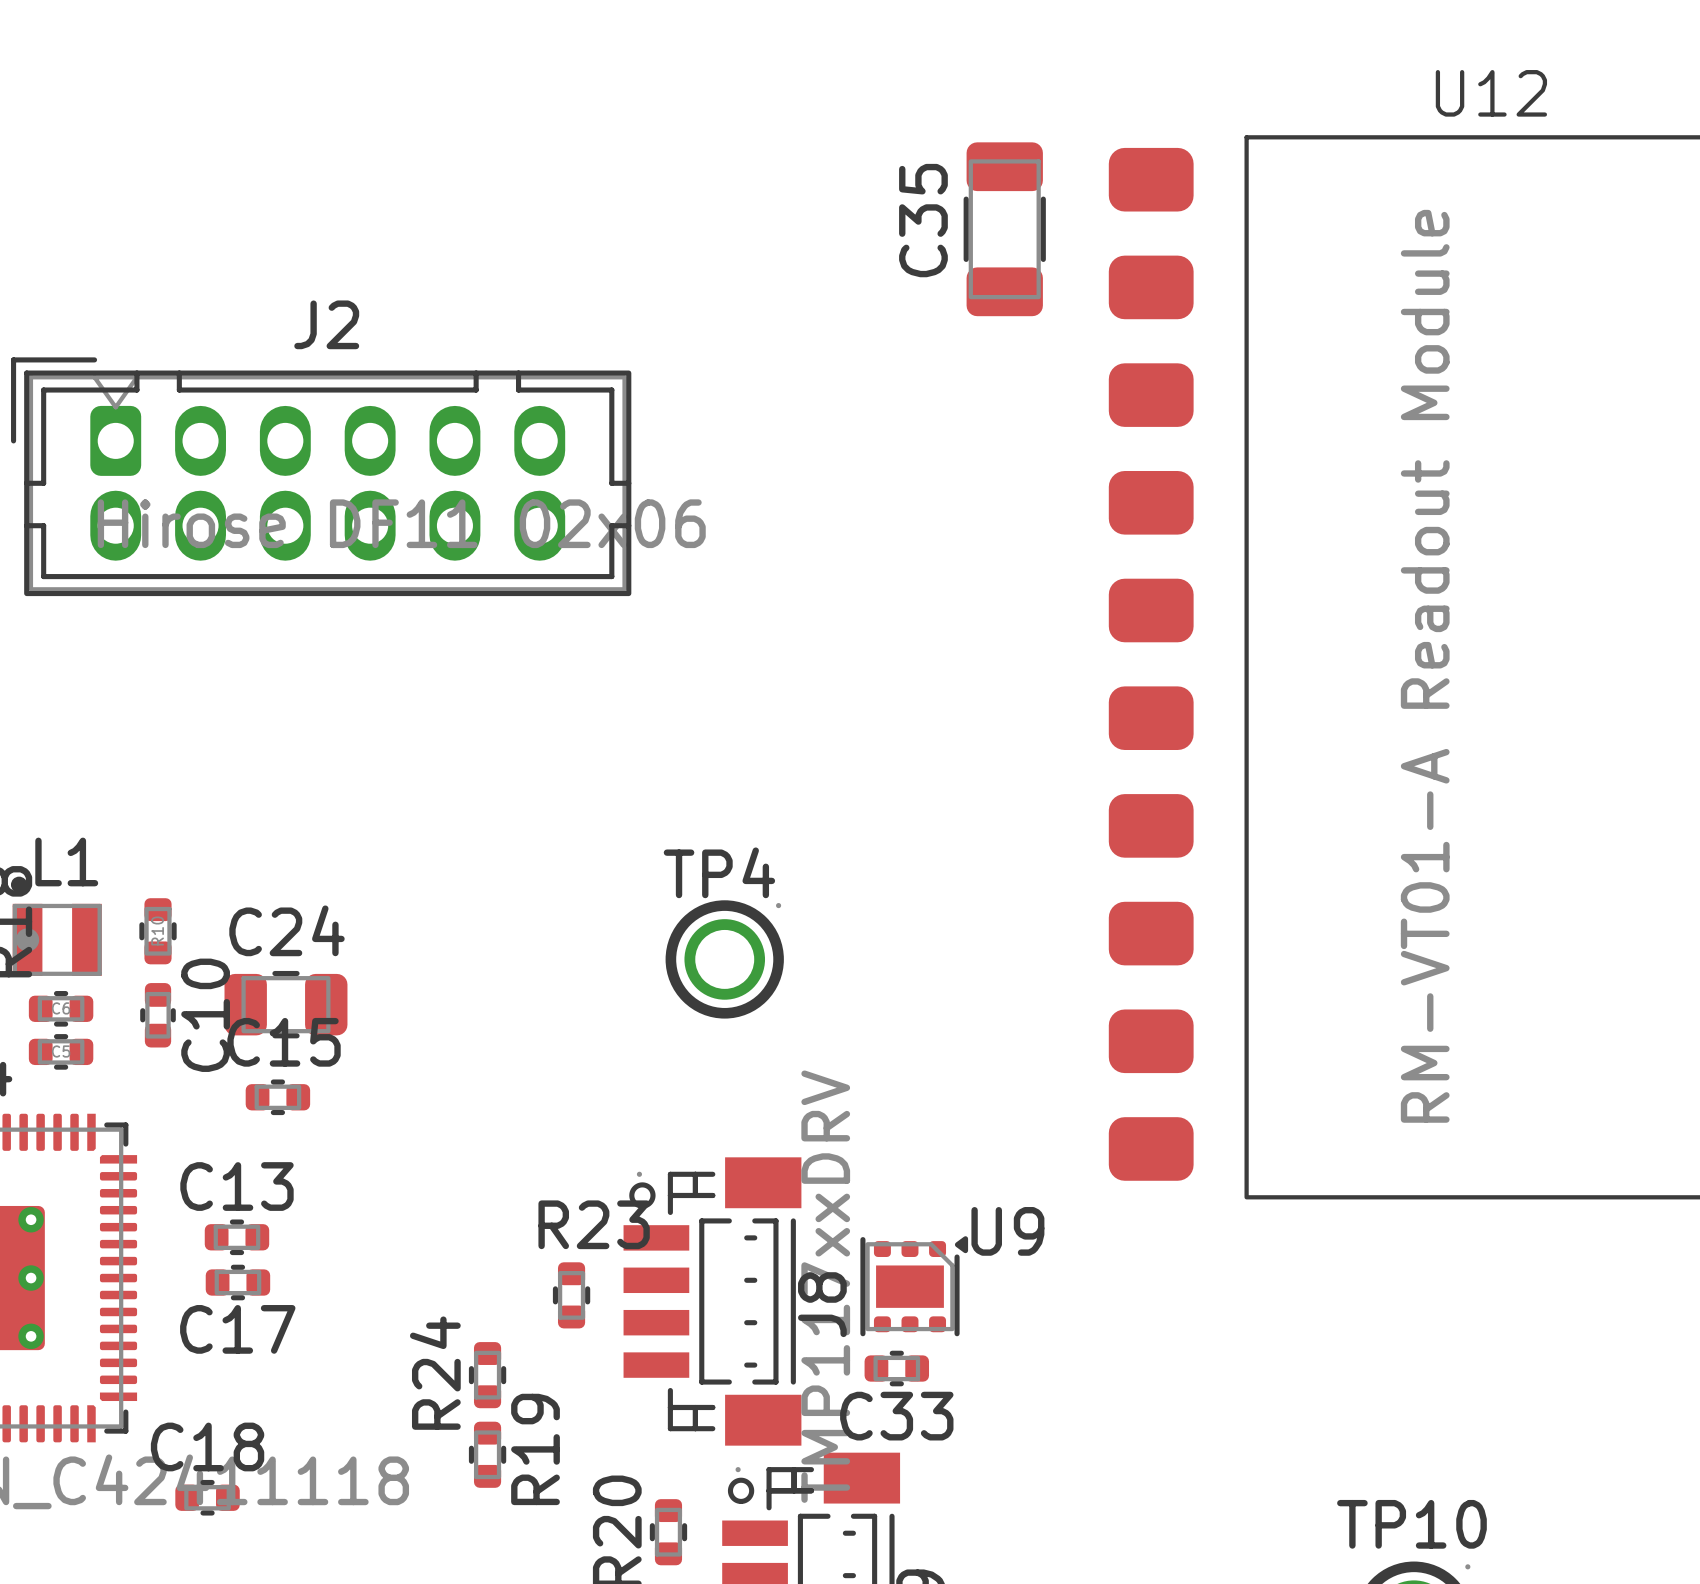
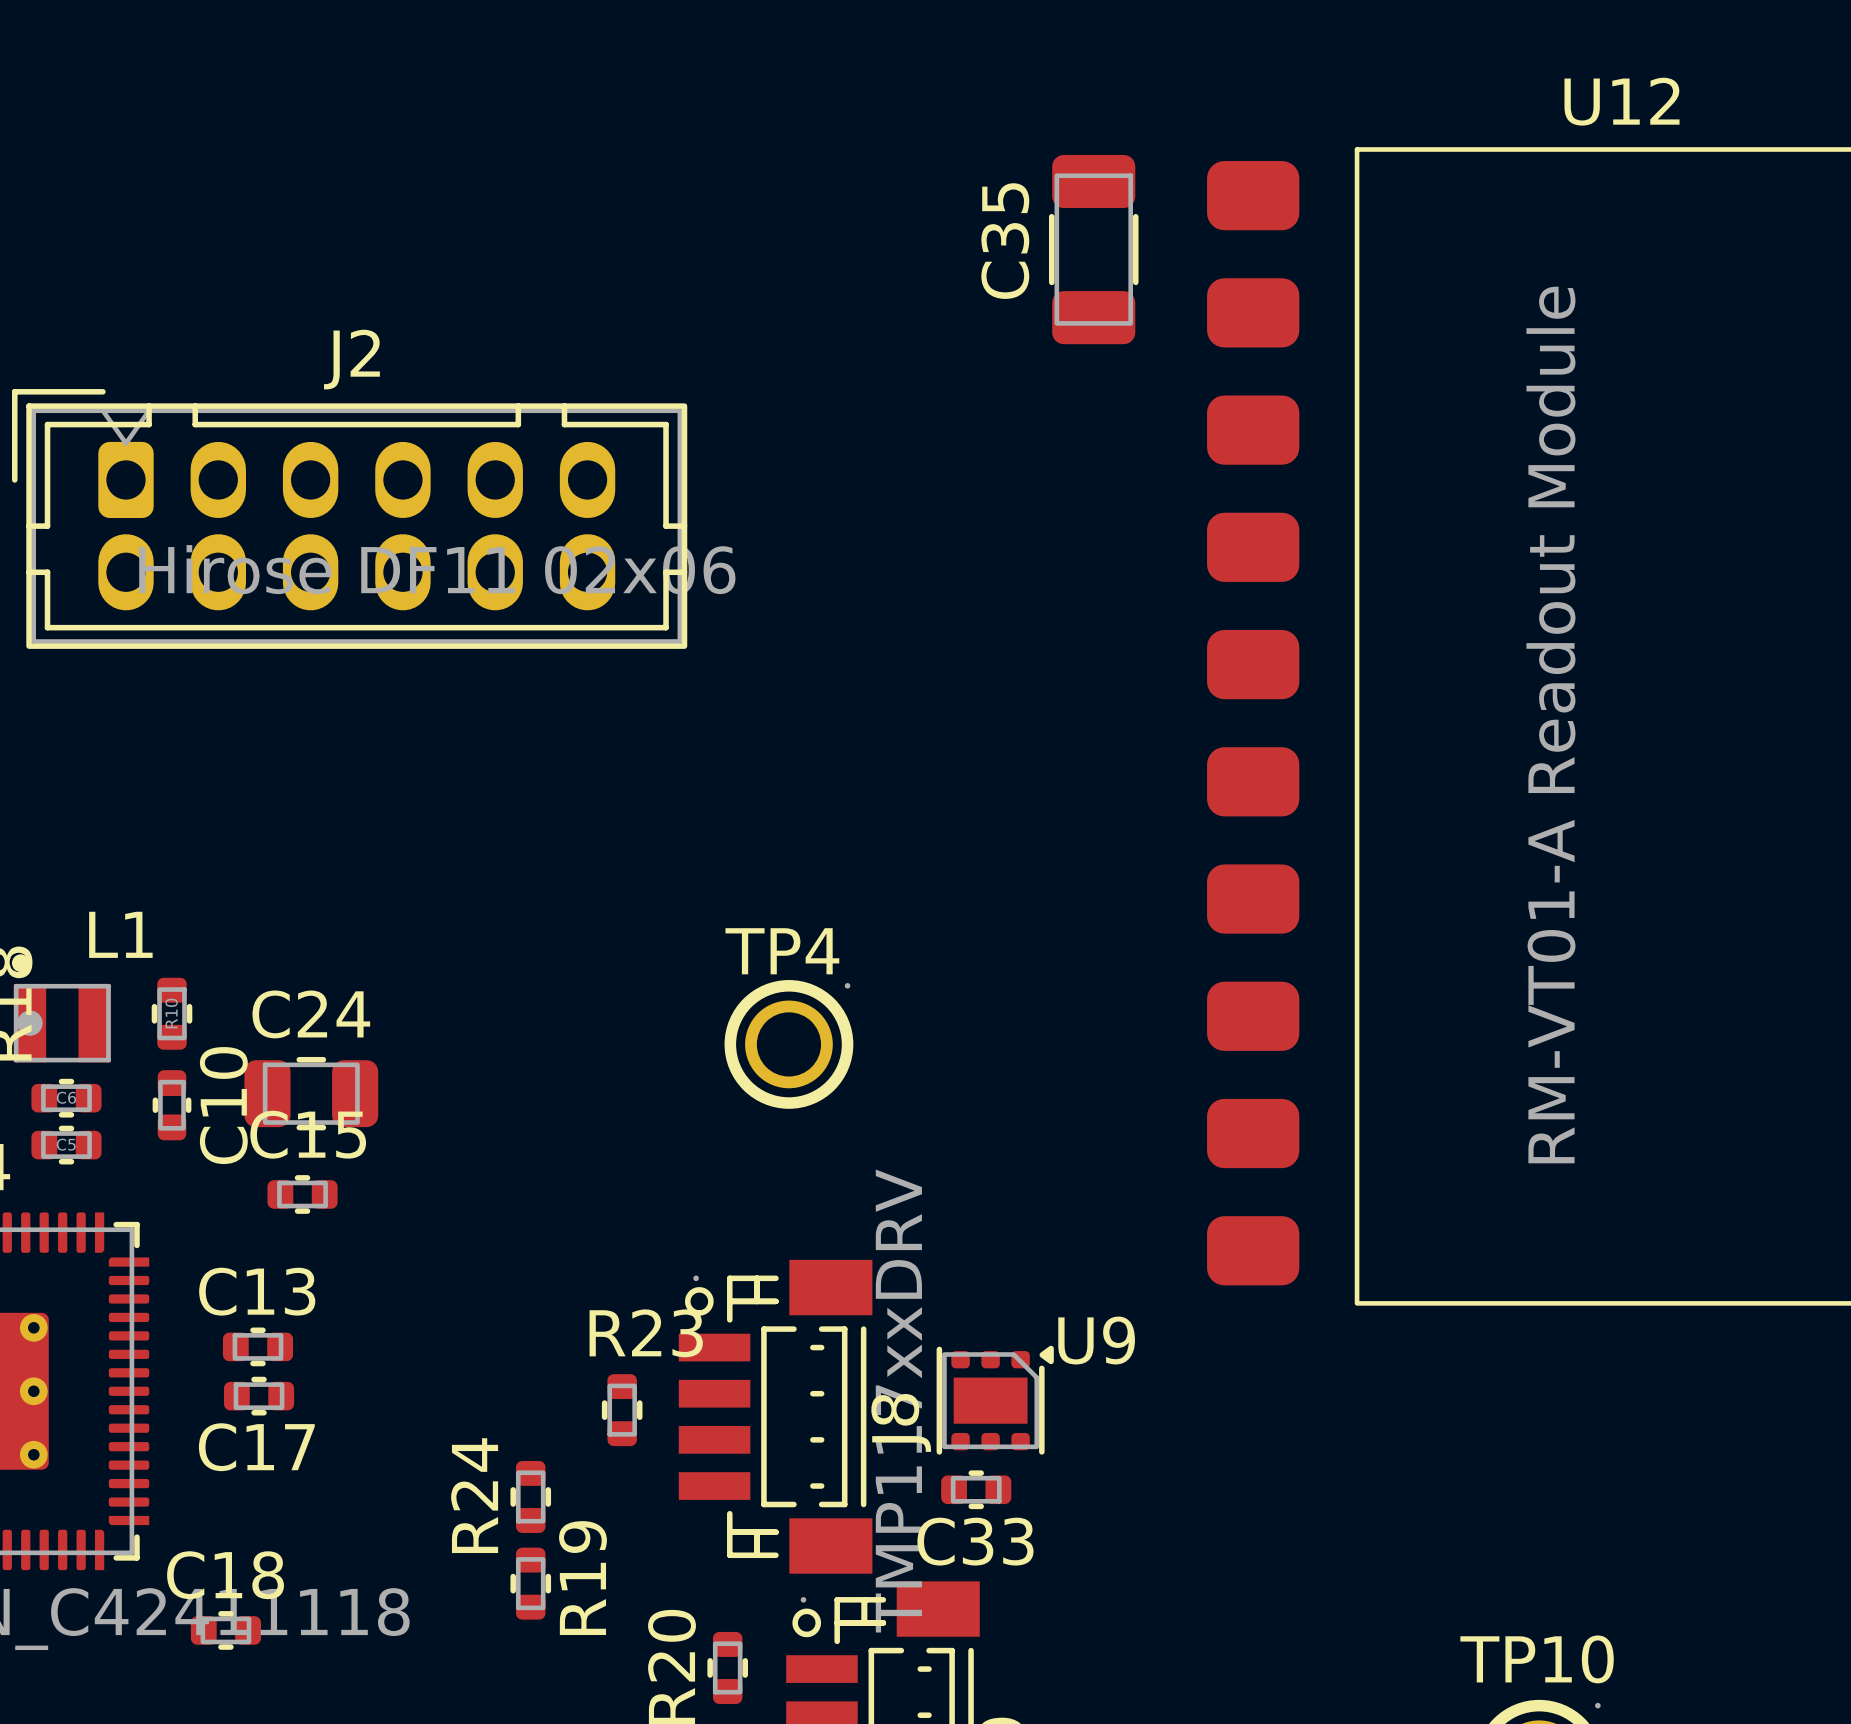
L1 name position: L1 (66, 861) -> L1 (120, 934)

